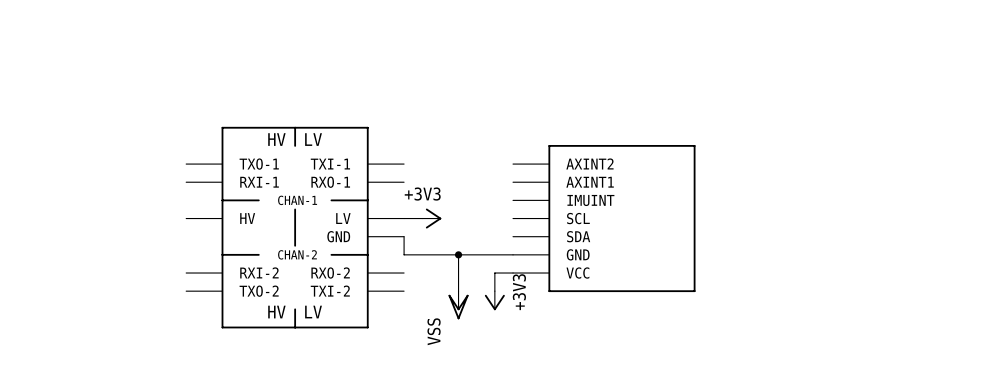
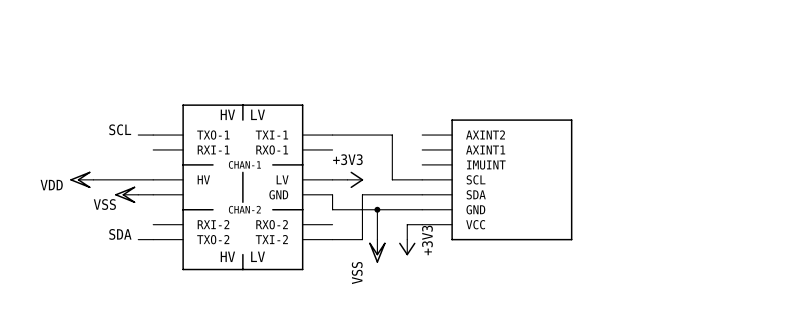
part symbol: [186, 126, 405, 329] -> [153, 104, 333, 271]
label: none -> SCL (120, 129)
wire: none -> (138, 135) (153, 135)
wire: none -> (332, 135) (392, 135) (392, 179) (422, 179)
power symbol: none -> VDD (81, 179)
wire: none -> (93, 179) (153, 179)
power symbol: none -> VSS (126, 194)
wire: none -> (138, 194) (153, 194)
wire: none -> (422, 194) (362, 194) (362, 239) (332, 239)
label: none -> SDA (120, 234)
wire: none -> (138, 239) (153, 239)

